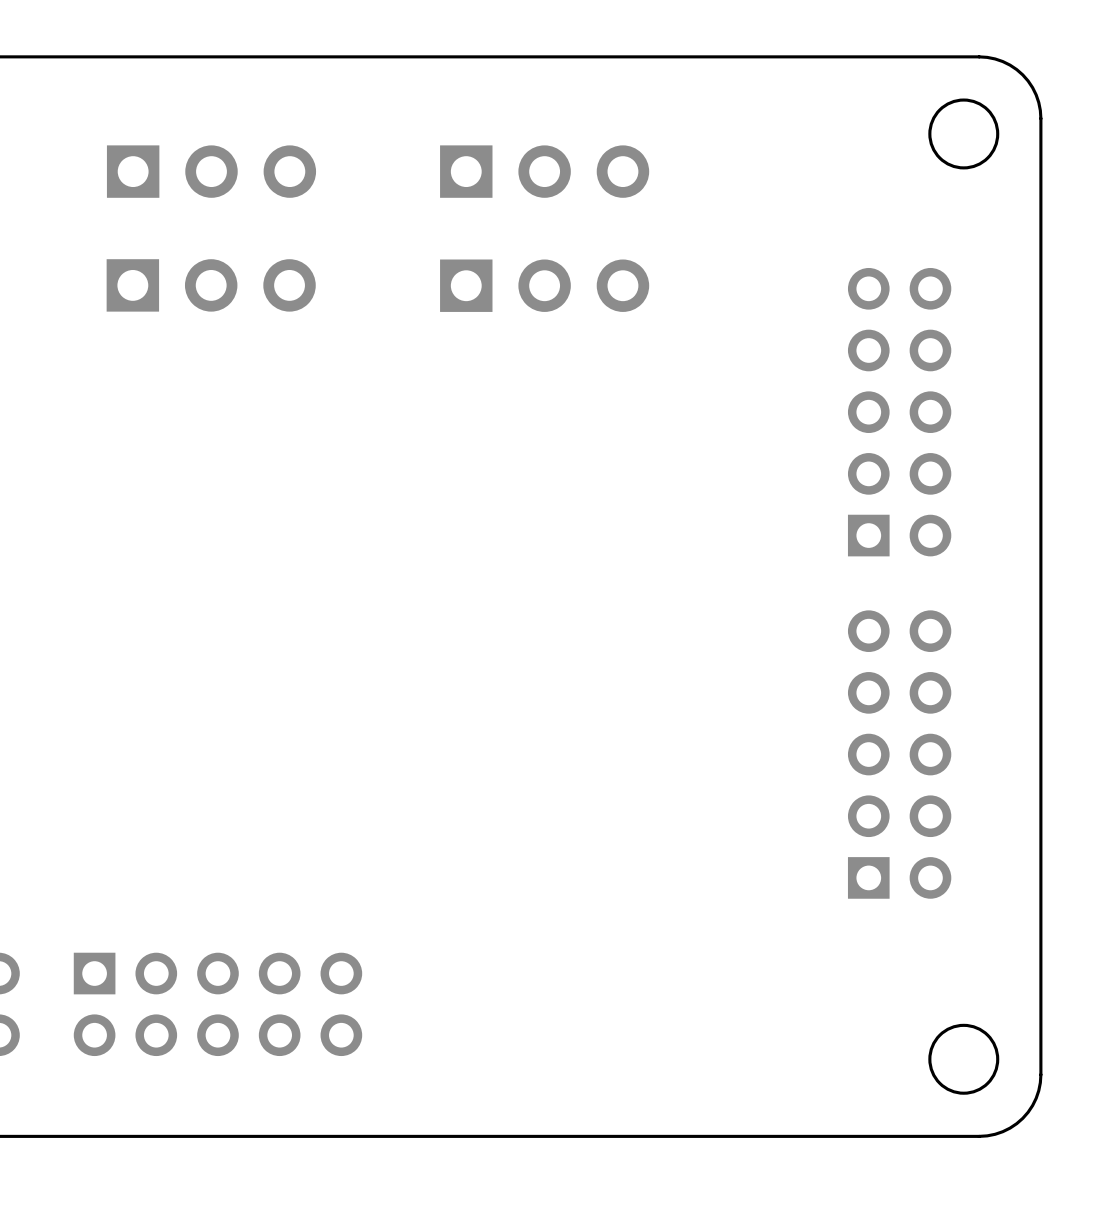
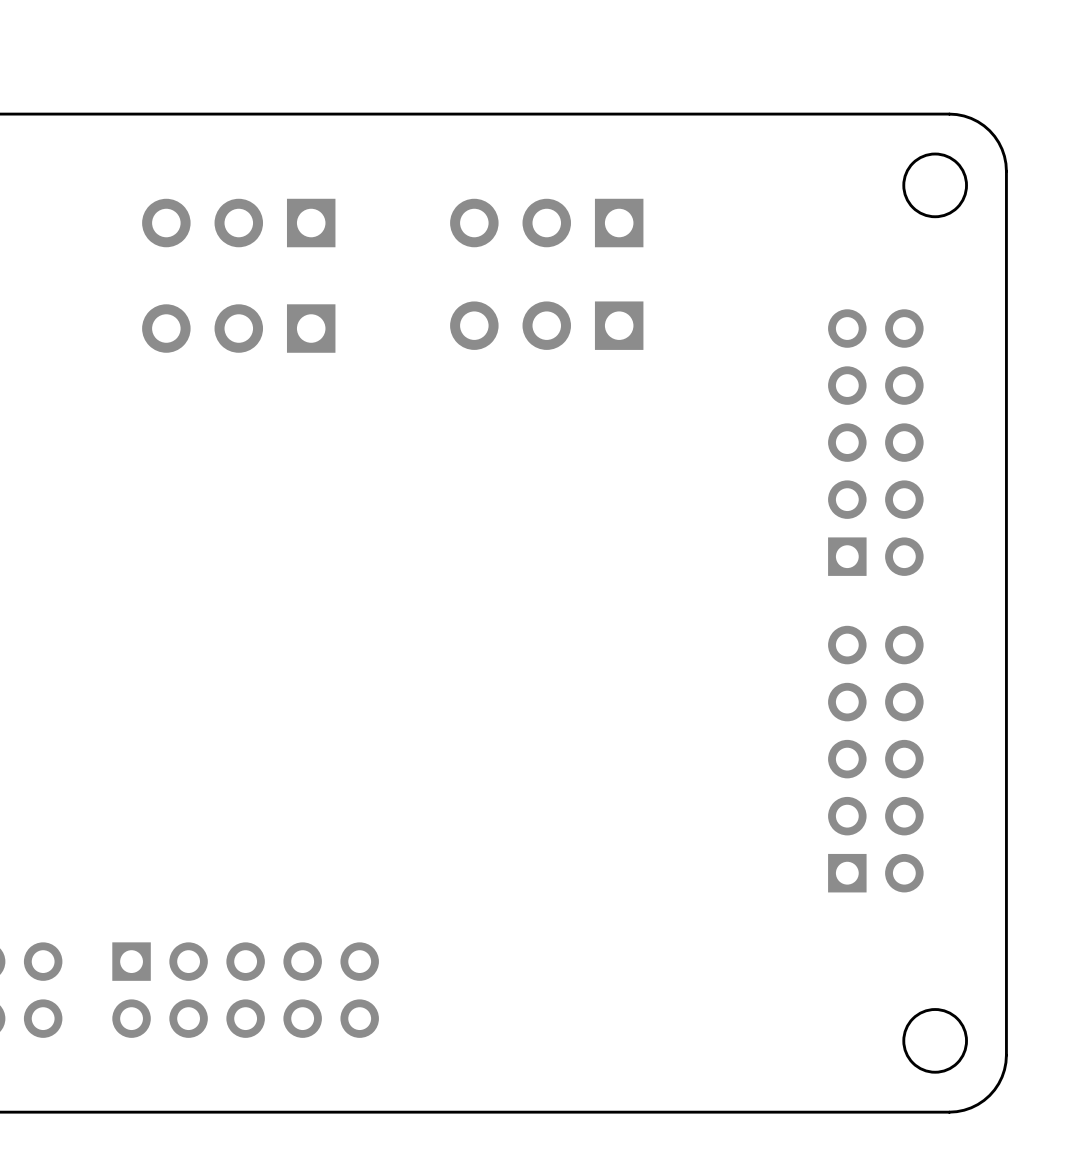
part rotation: 0° (211, 171) -> 180° (238, 223)
part rotation: 0° (544, 171) -> 180° (546, 223)
part rotation: 0° (211, 285) -> 180° (238, 328)
part rotation: 0° (544, 285) -> 180° (546, 325)

